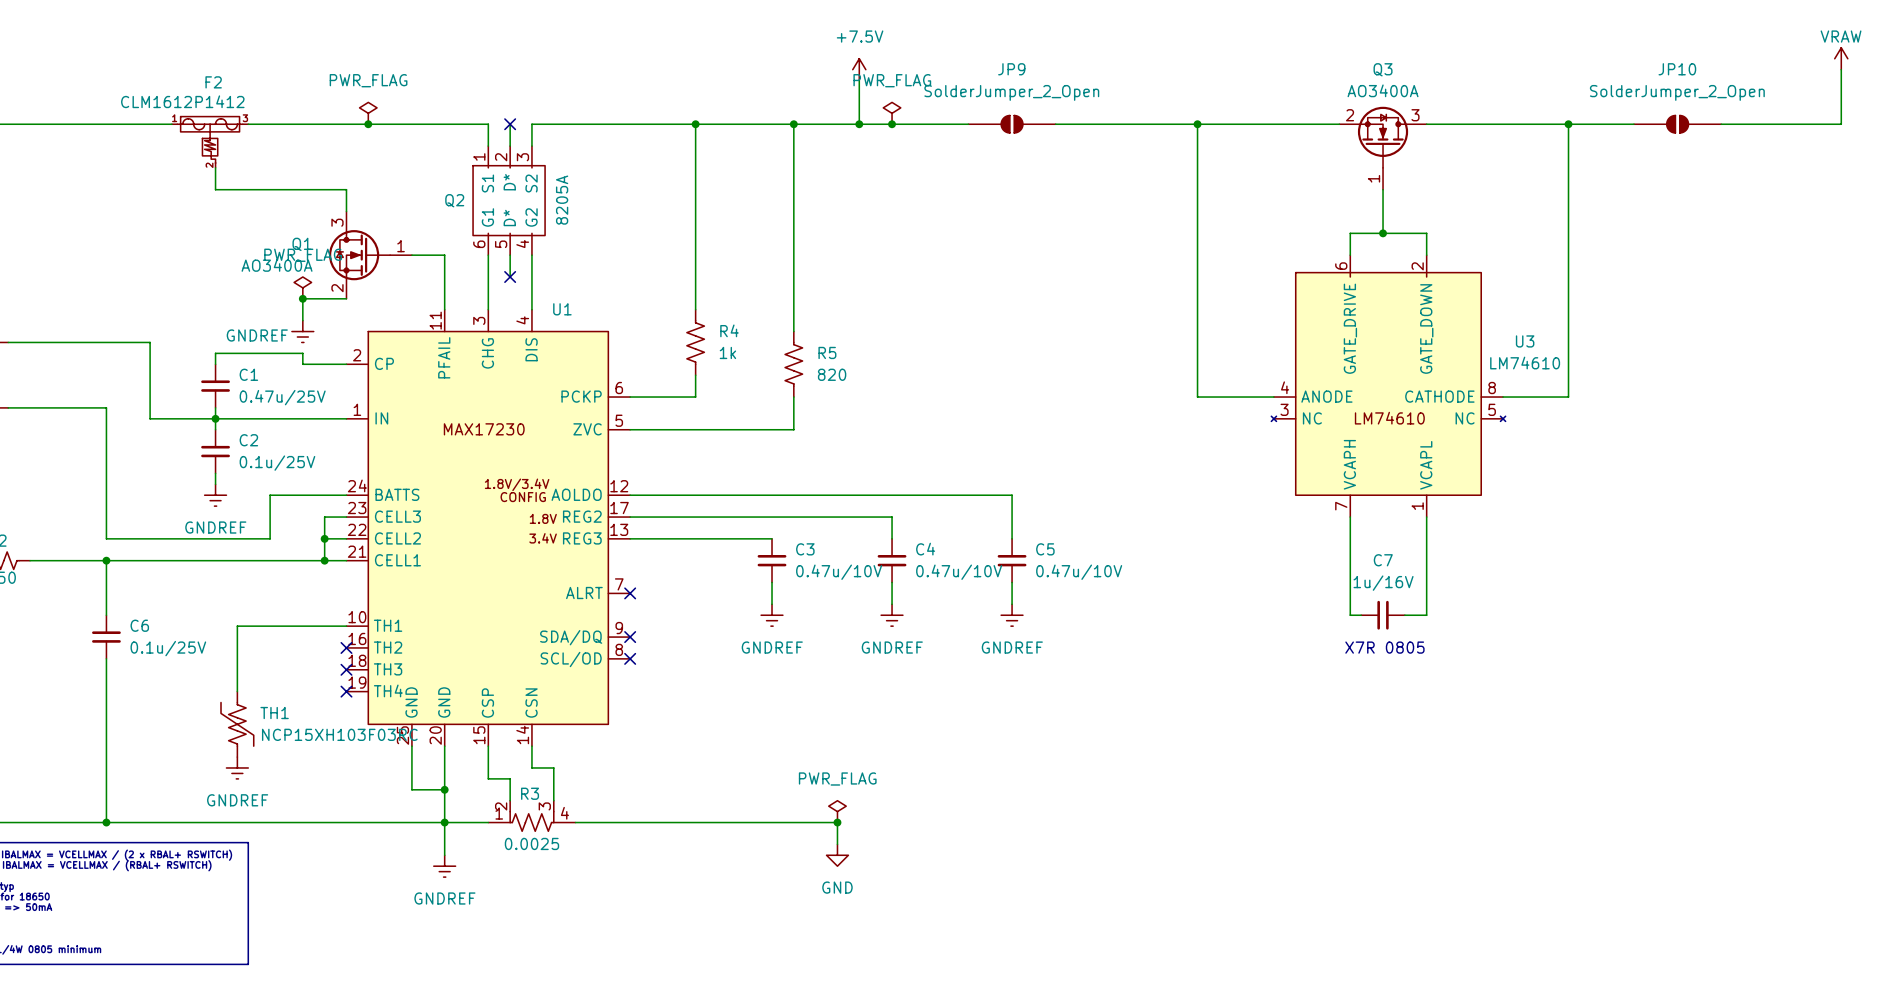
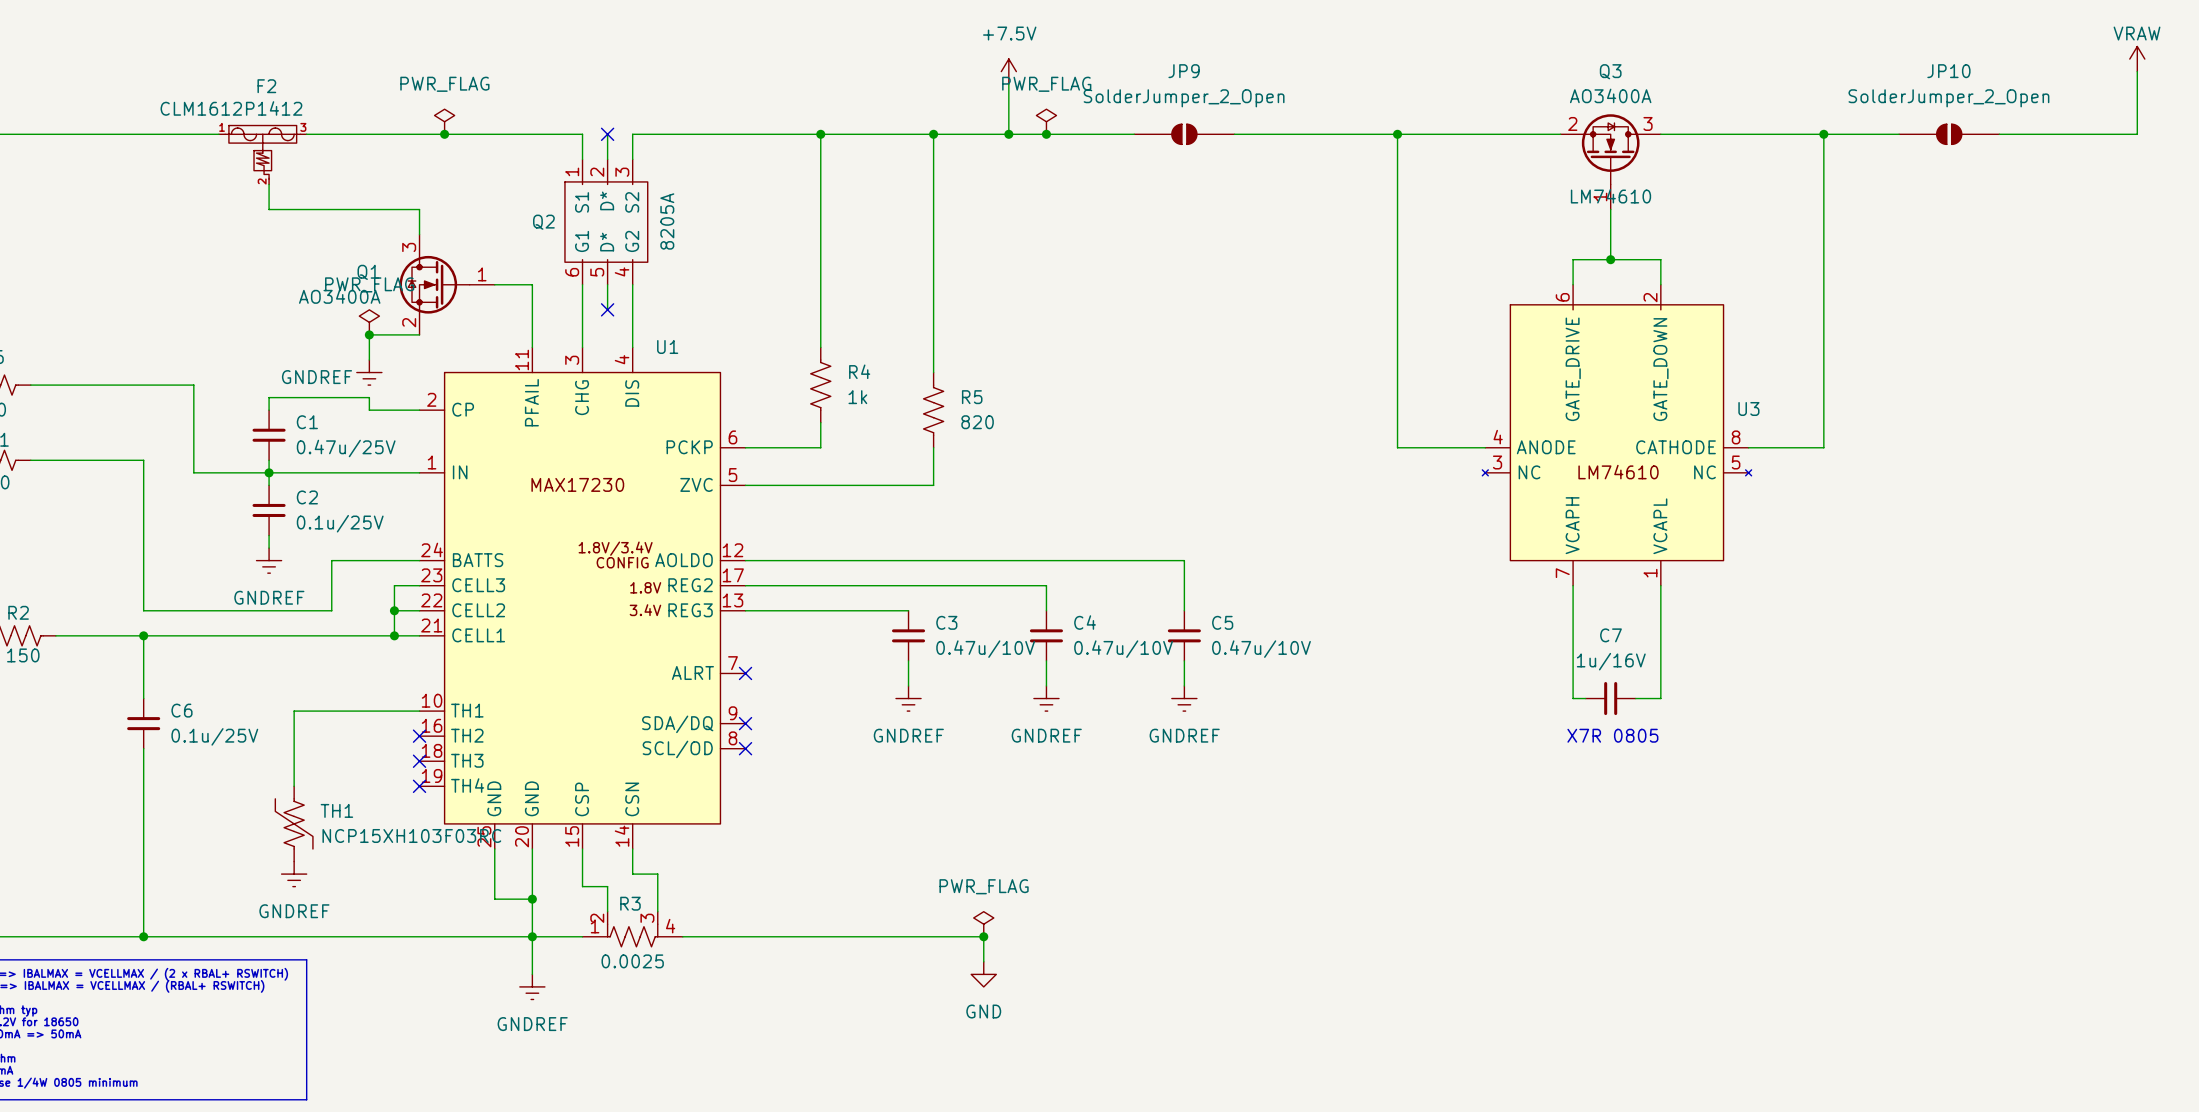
U3 name position: U3 (1525, 341) -> U3 (1748, 408)
U3 value position: LM74610 (1525, 363) -> LM74610 (1610, 196)

